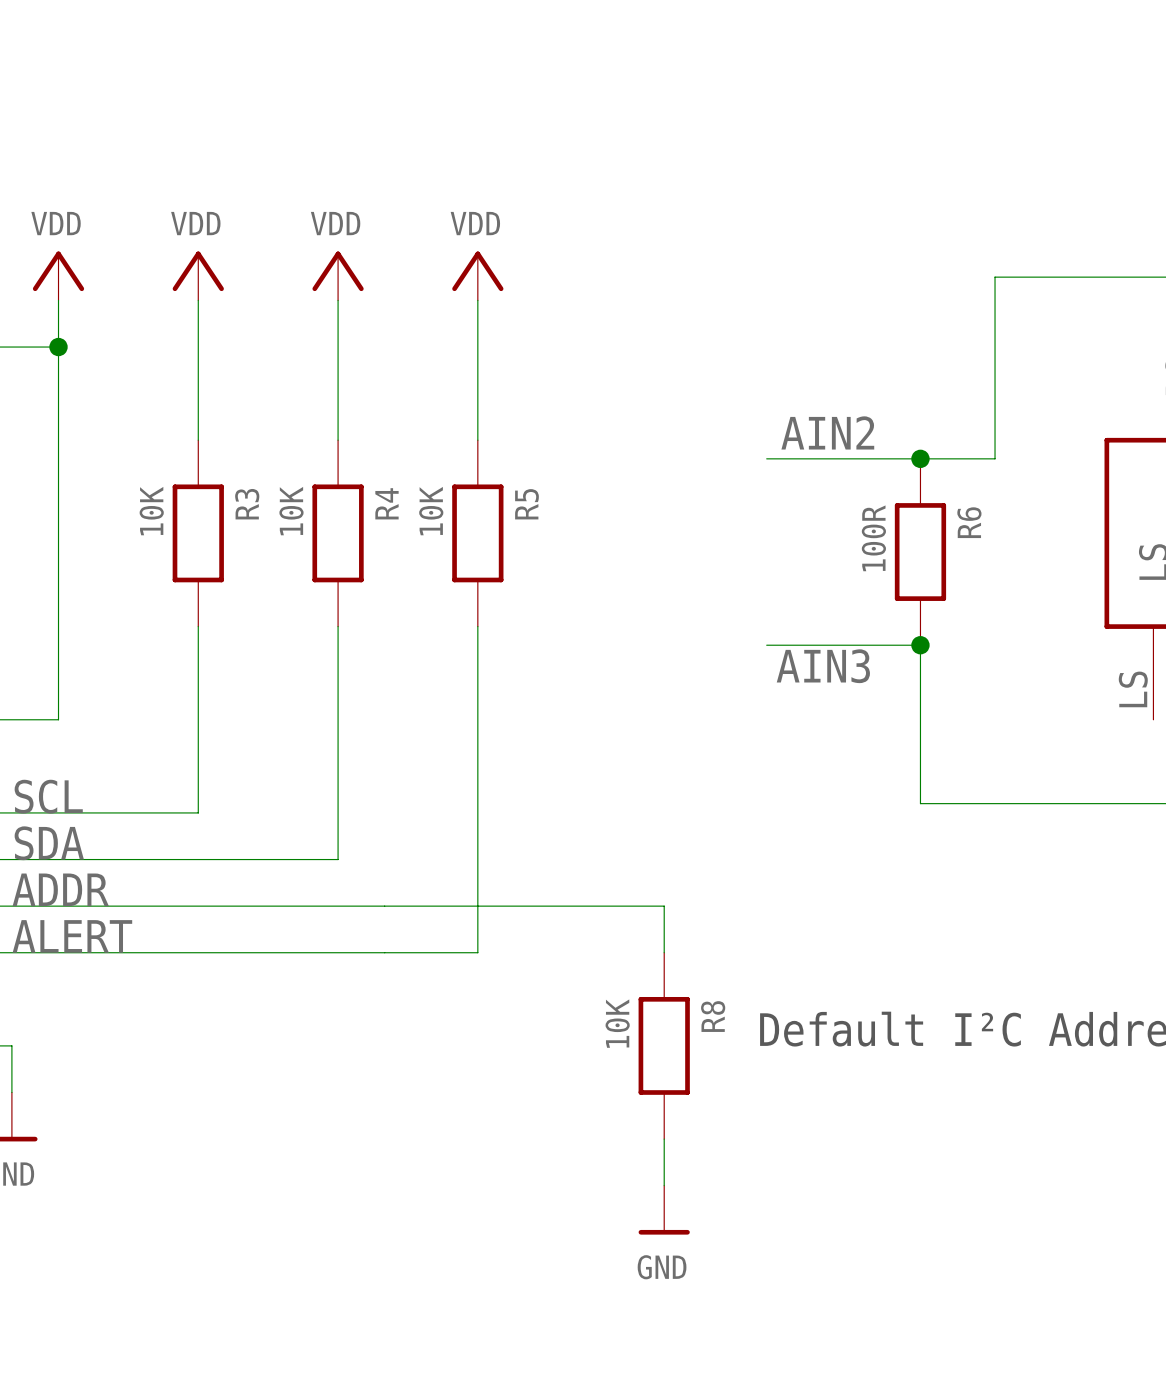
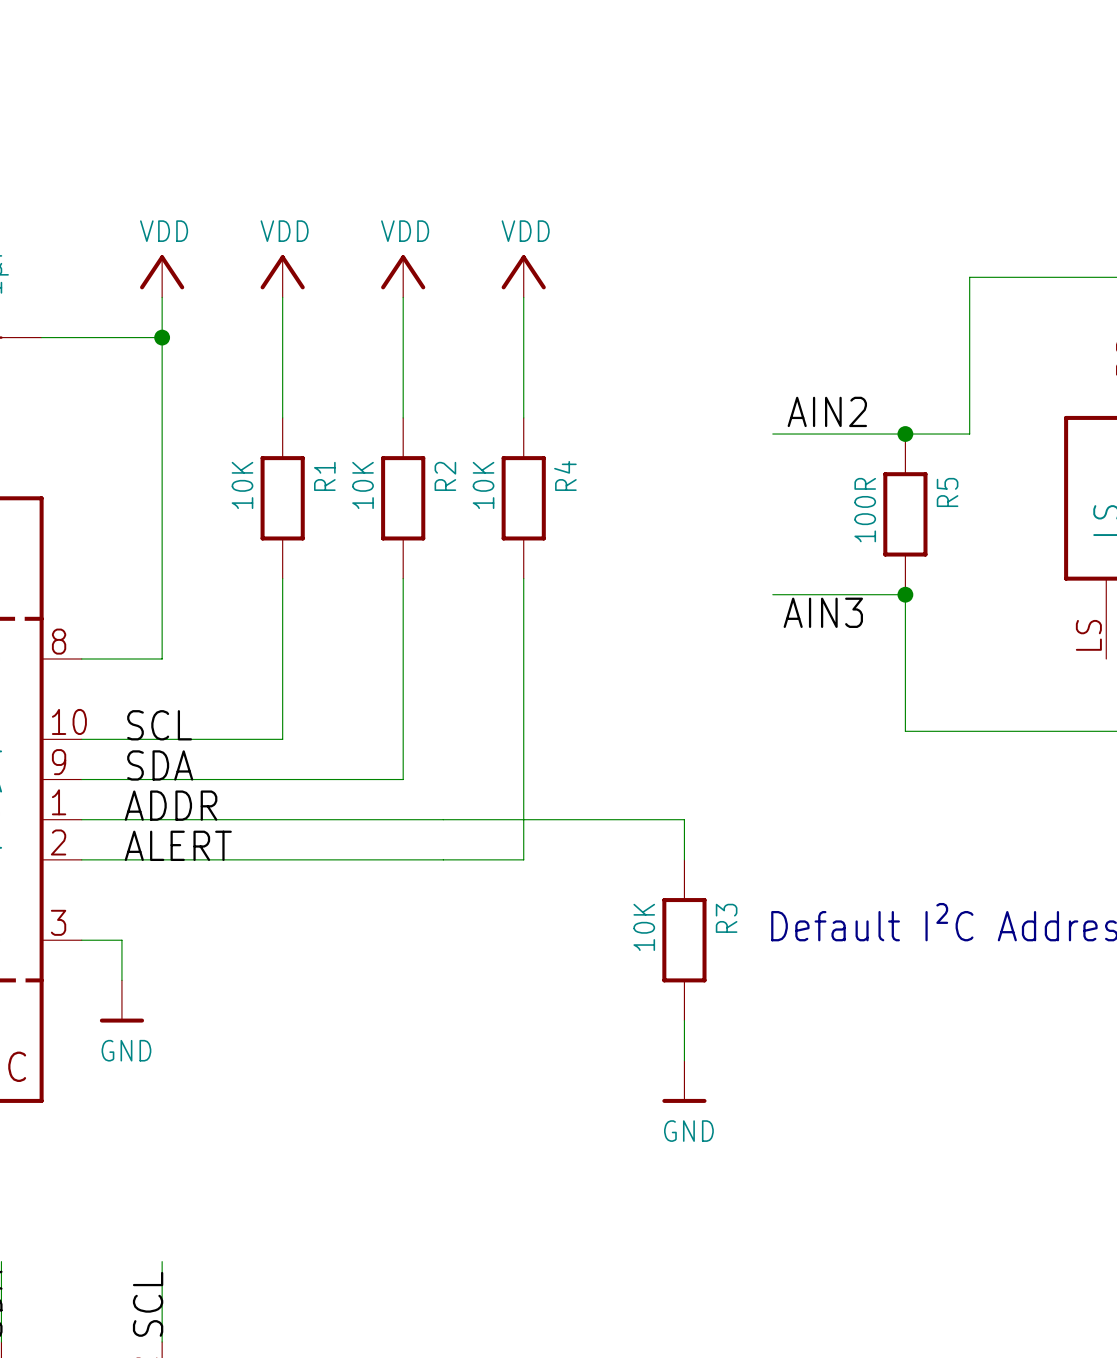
R4 name: R4 (386, 503) -> R2 (445, 476)
R3 name: R3 (247, 504) -> R1 (324, 476)
R5 name: R5 (526, 504) -> R4 (565, 475)
R6 name: R6 (969, 522) -> R5 (947, 492)
R8 name: R8 (713, 1016) -> R3 (726, 918)

